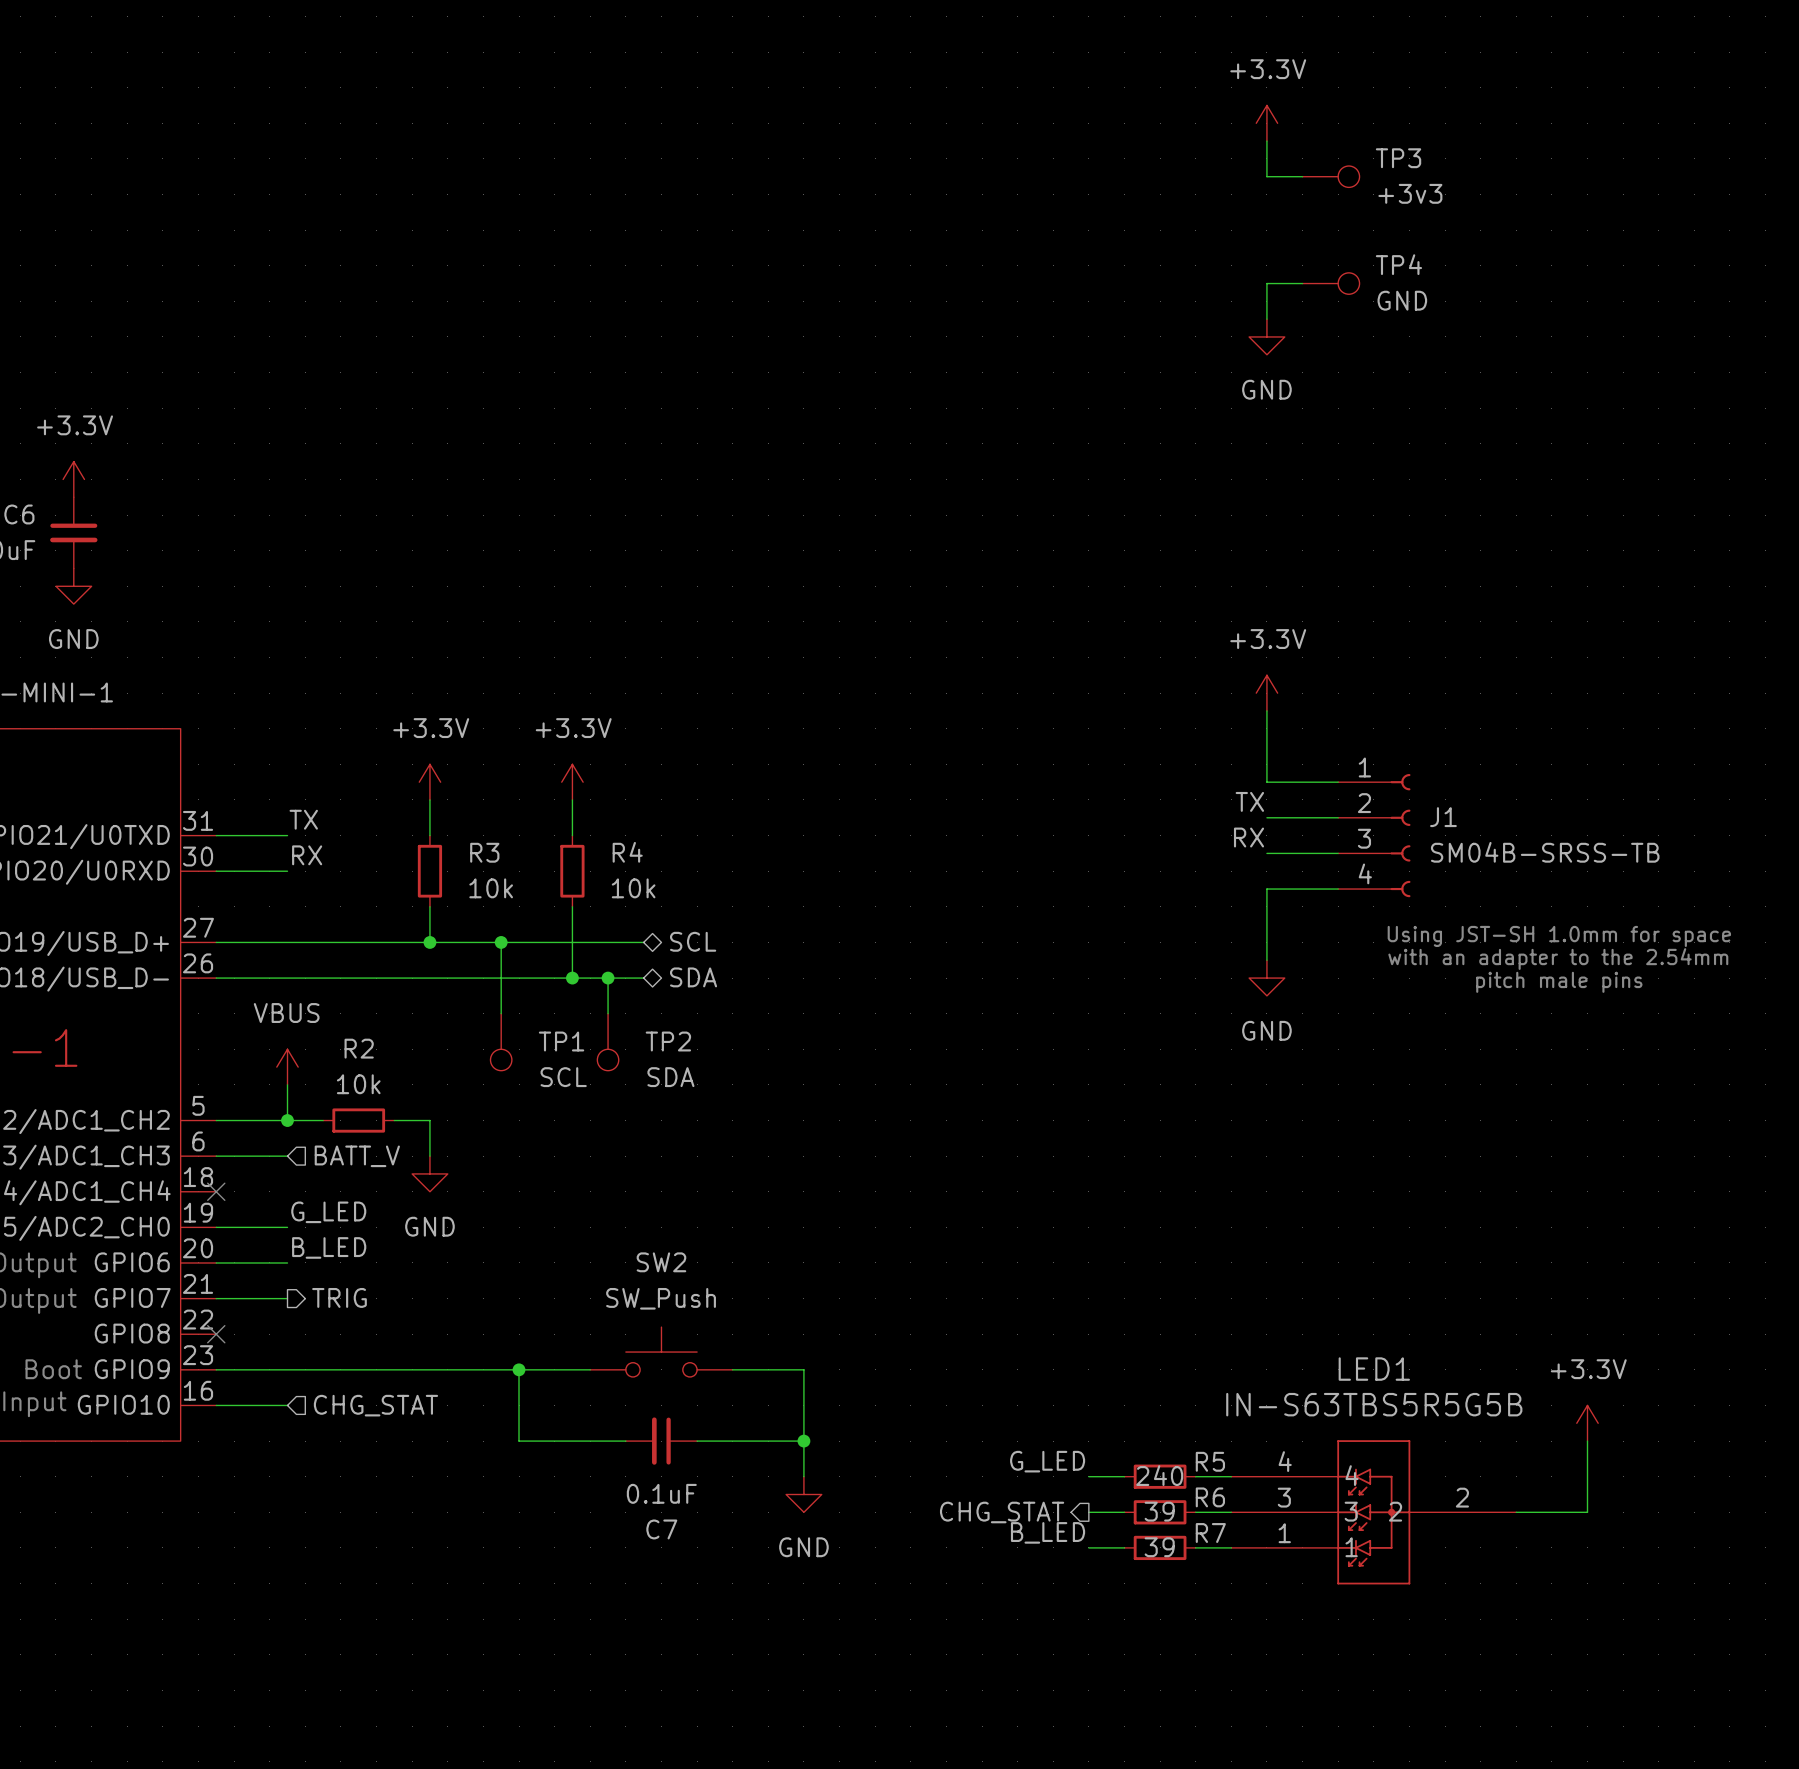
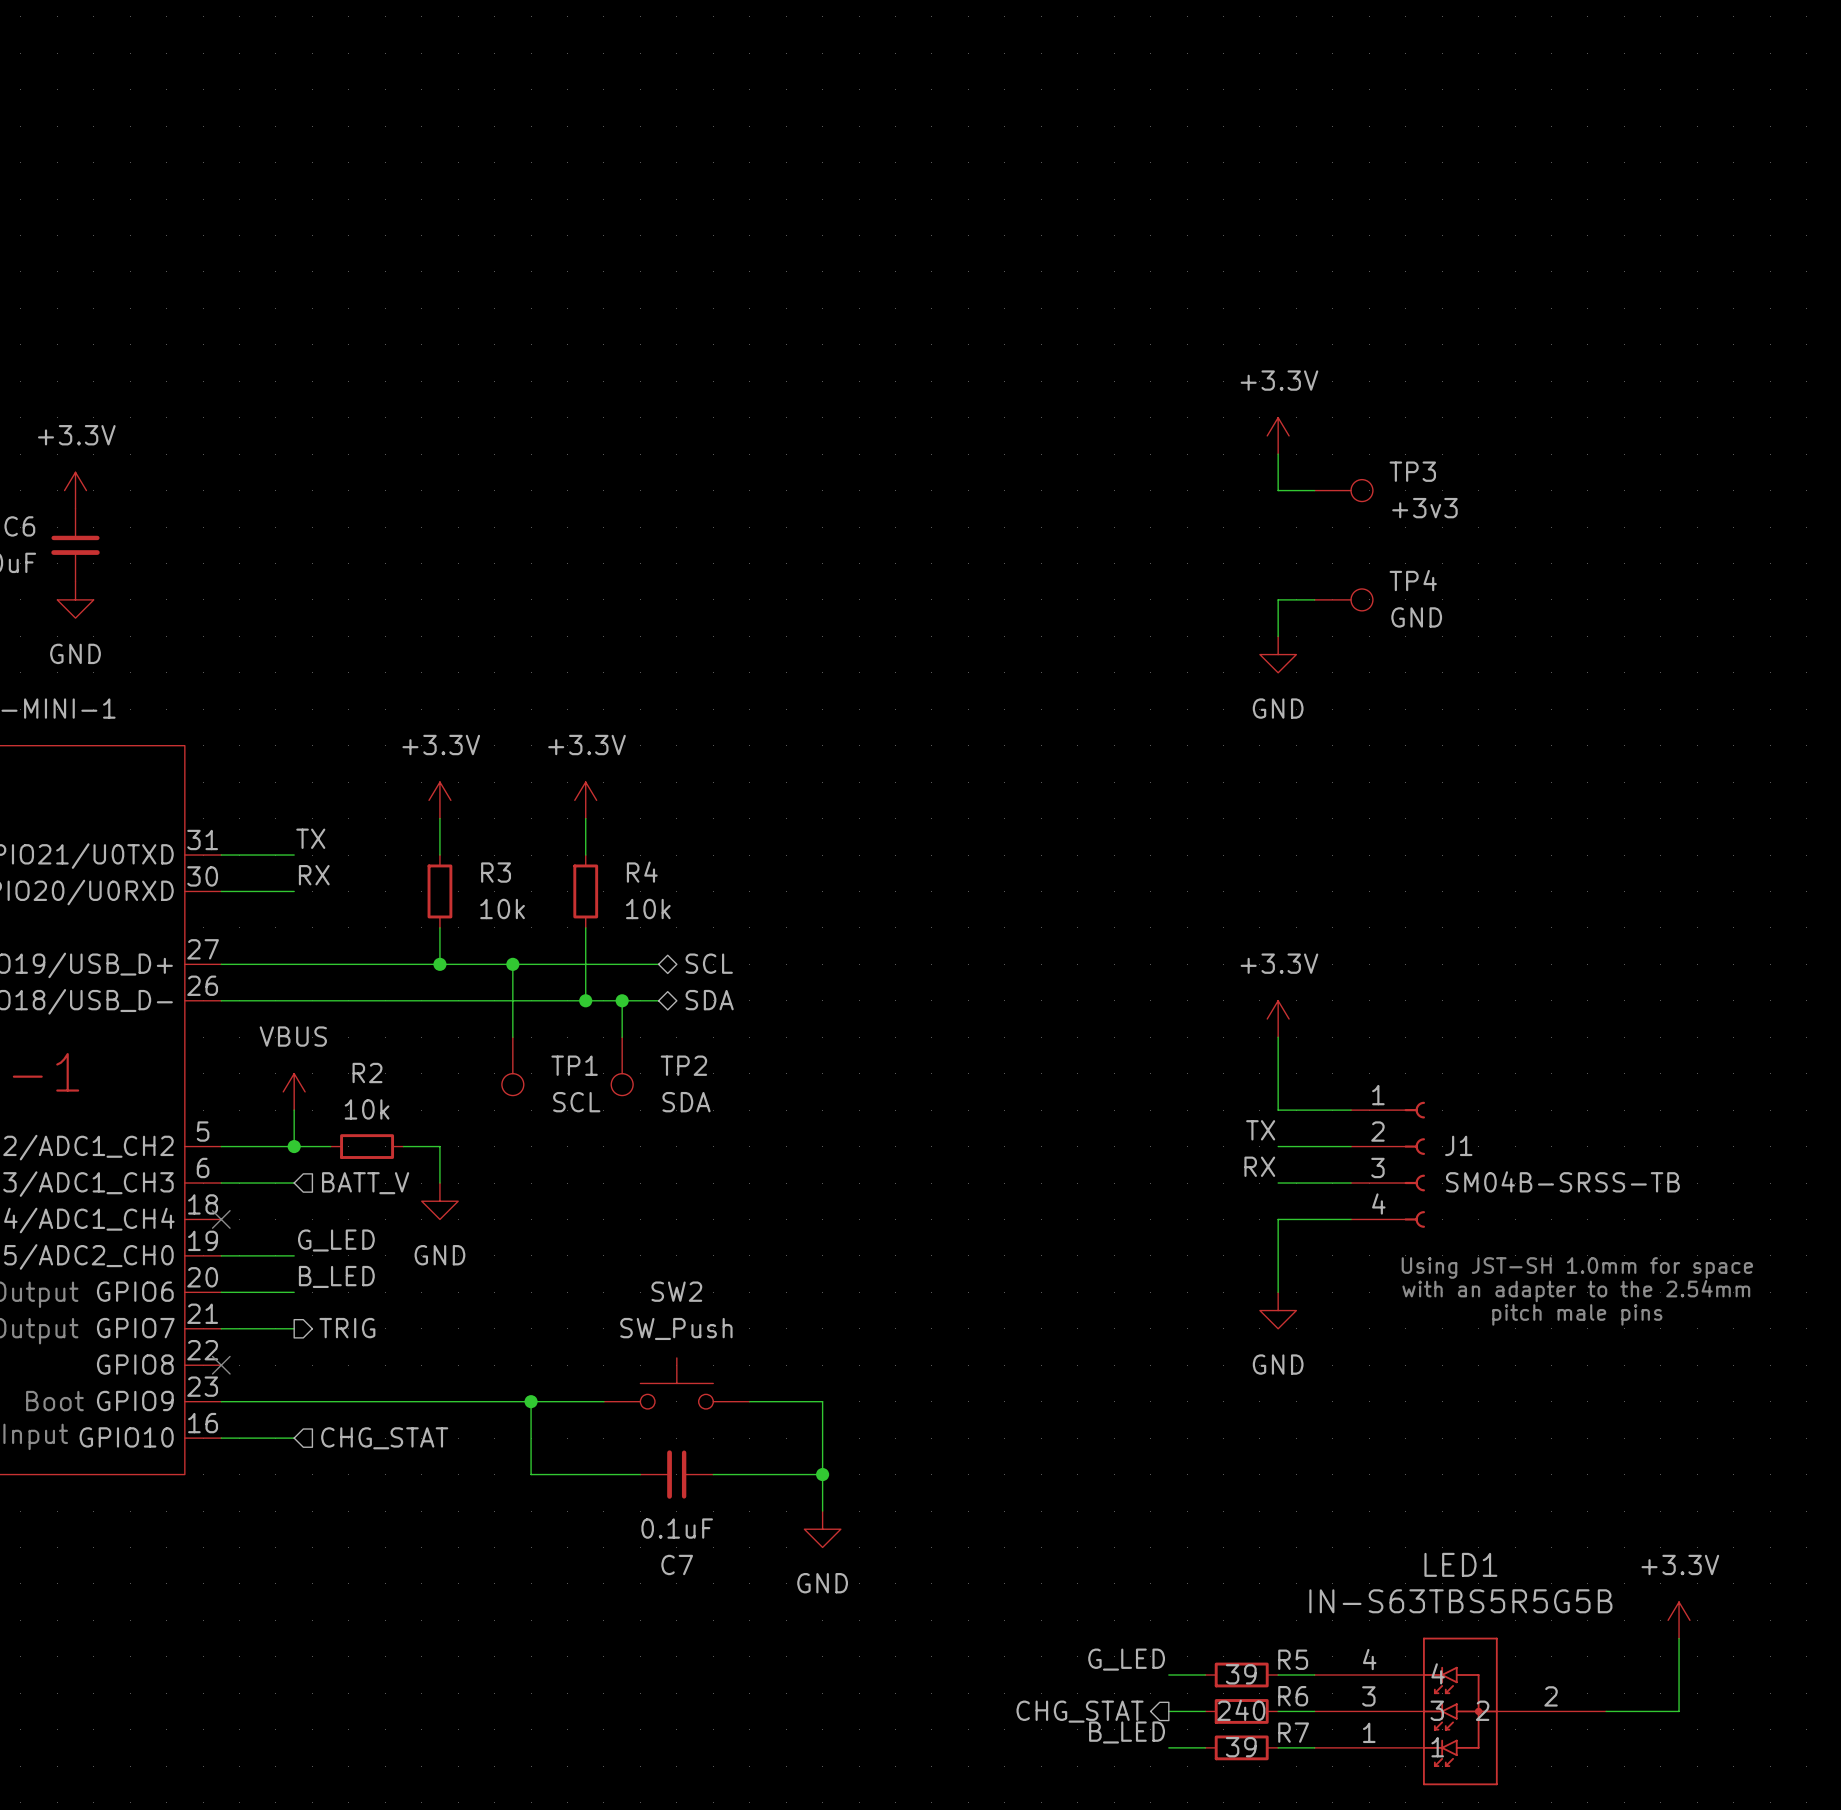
power symbol: +3.3V (1266, 123) -> none
wire: (1266, 141) (1266, 176) (1302, 176) -> (1278, 454) (1278, 490) (1314, 490)
TP3 position: (1331, 176) -> (1343, 490)
wire: (1302, 283) (1266, 283) (1266, 319) -> (1314, 599) (1278, 599) (1278, 636)
TP4 position: (1331, 283) -> (1343, 599)
power symbol: GND (1266, 336) -> none
power symbol: none -> +3.3V (1278, 435)
power symbol: none -> GND (1278, 654)
power symbol: +3.3V (1266, 693) -> none
wire: (1266, 710) (1266, 782) (1338, 782) -> (1278, 1037) (1278, 1110) (1351, 1110)
label position: TX (1249, 801) -> TX (1260, 1130)
wire: (1266, 817) (1338, 817) -> (1278, 1146) (1351, 1146)
J1 position: (1374, 835) -> (1388, 1164)
label position: RX (1249, 837) -> RX (1259, 1166)
wire: (1266, 853) (1338, 853) -> (1278, 1183) (1351, 1183)
wire: (1338, 889) (1266, 889) (1266, 960) -> (1351, 1219) (1278, 1219) (1278, 1292)
text position: Using JST-SH 1.0mm for space (1559, 936) -> Using JST-SH 1.0mm for space (1577, 1267)
text position: with an adapter to the 2.54mm (1558, 959) -> with an adapter to the 2.54mm (1576, 1291)
power symbol: GND (1266, 978) -> none
text position: pitch male pins (1559, 982) -> pitch male pins (1577, 1314)
power symbol: none -> +3.3V (1278, 1019)
power symbol: none -> GND (1278, 1310)
power symbol position: +3.3V (1587, 1423) -> +3.3V (1679, 1620)
wire: (1587, 1441) (1587, 1512) (1516, 1512) -> (1679, 1638) (1679, 1711) (1606, 1711)
label position: G_LED (1047, 1461) -> G_LED (1126, 1659)
R5 value position: 240 (1159, 1475) -> 240 (1241, 1710)
wire: (1088, 1476) (1124, 1476) -> (1168, 1674) (1205, 1674)
R5 position: (1160, 1476) -> (1241, 1674)
wire: (1195, 1476) (1231, 1476) -> (1278, 1674) (1314, 1674)
R6 value position: 39 (1159, 1511) -> 39 (1241, 1674)
hierarchical label position: CHG_STAT (1002, 1512) -> CHG_STAT (1080, 1711)
wire: (1088, 1512) (1124, 1512) -> (1168, 1711) (1205, 1711)
R6 position: (1160, 1512) -> (1241, 1711)
wire: (1195, 1512) (1231, 1512) -> (1278, 1711) (1314, 1711)
LED1 position: (1373, 1512) -> (1460, 1711)
label position: B_LED (1048, 1532) -> B_LED (1127, 1732)
wire: (1088, 1547) (1124, 1547) -> (1168, 1747) (1205, 1747)
R7 position: (1160, 1547) -> (1241, 1747)
wire: (1195, 1547) (1231, 1547) -> (1278, 1747) (1314, 1747)

